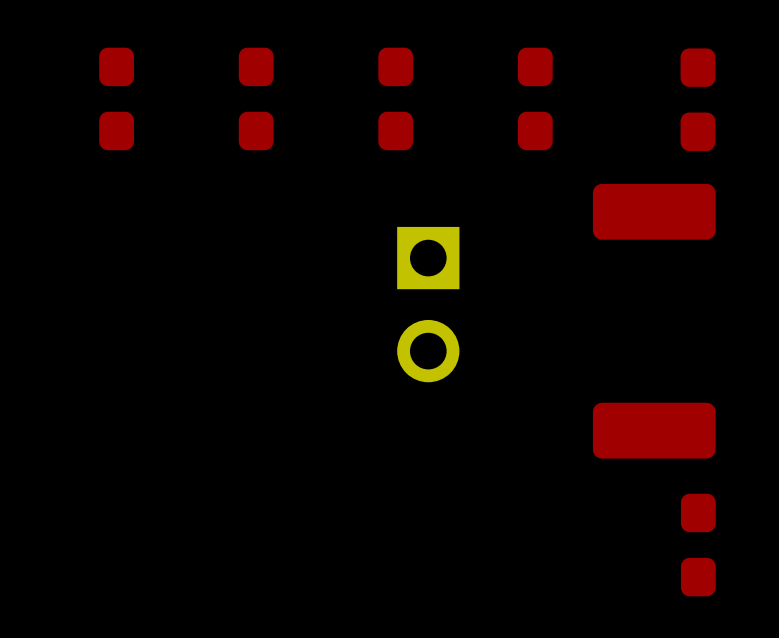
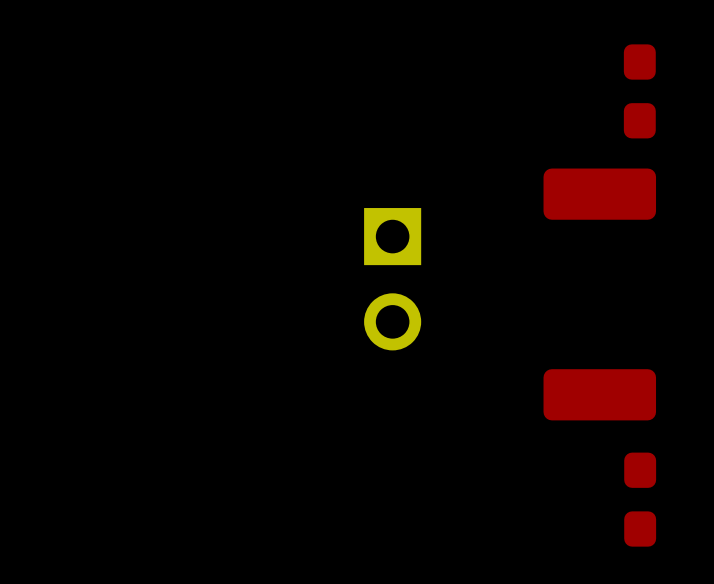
part: (116, 98) -> none
part: (256, 98) -> none
part: (395, 98) -> none
part: (535, 98) -> none

